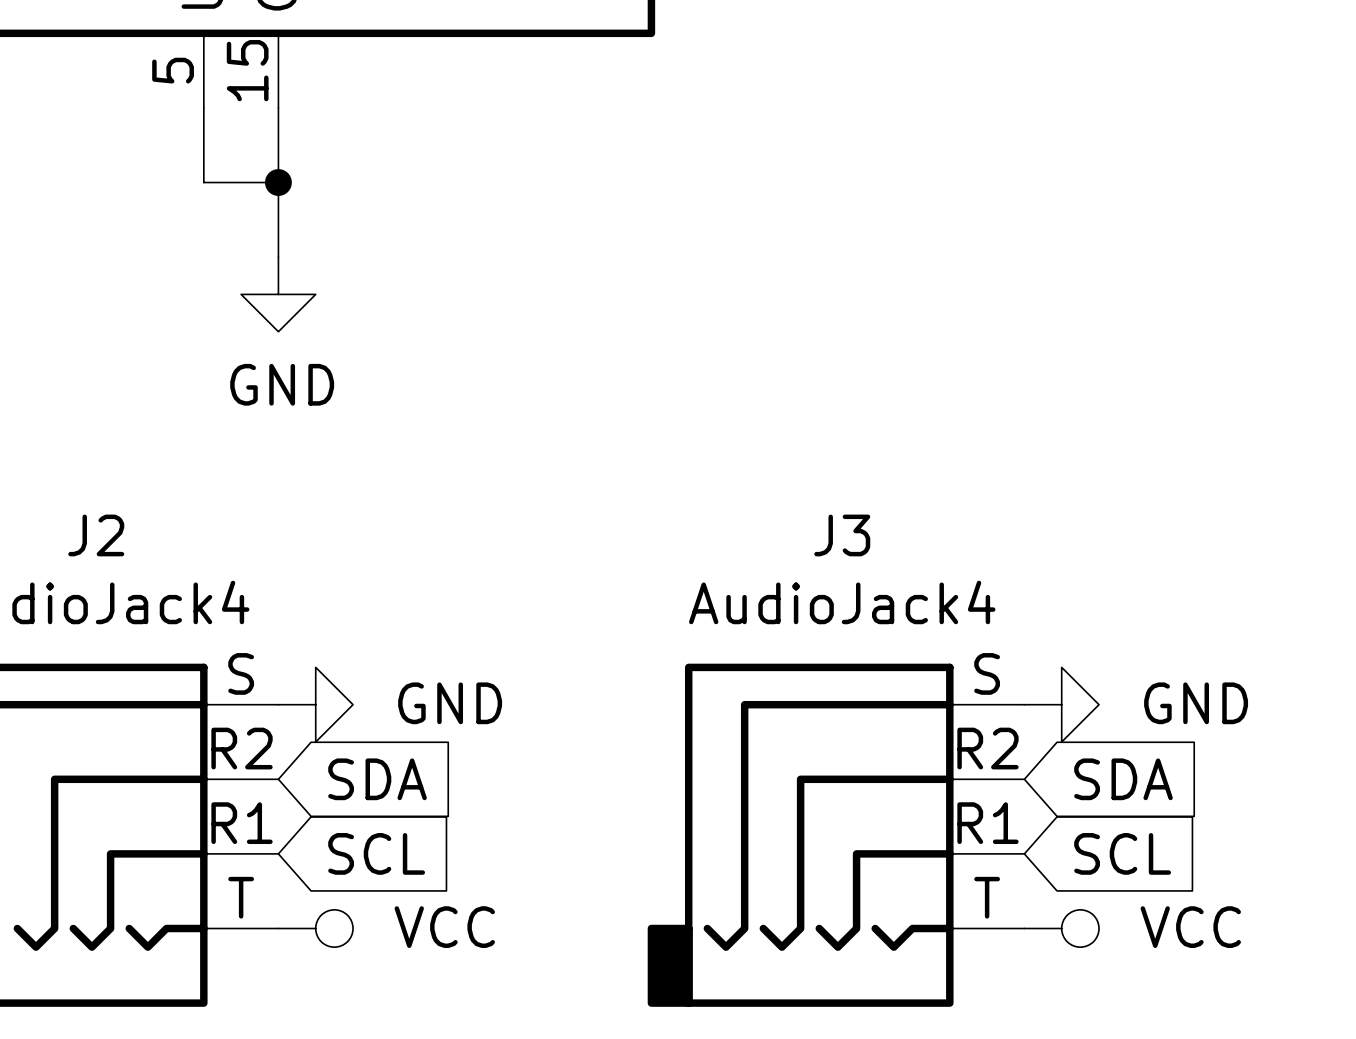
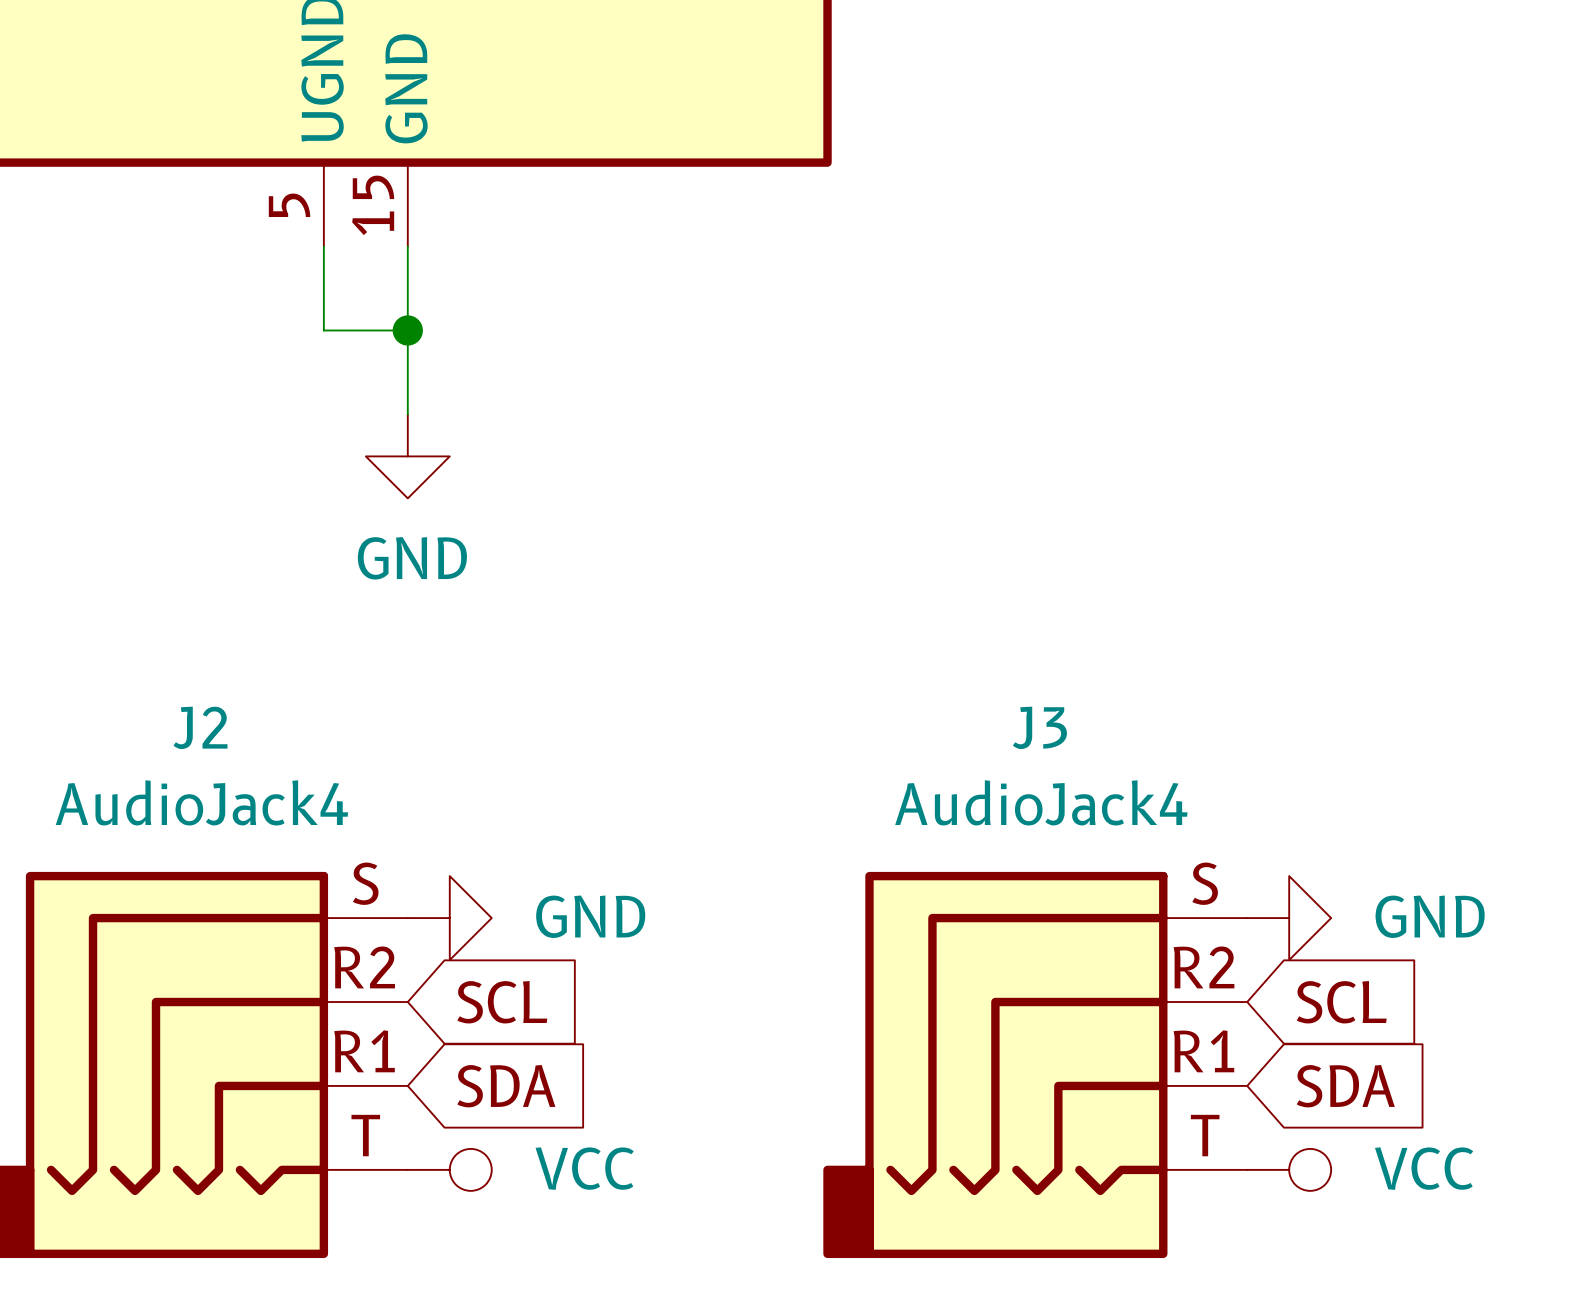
global label: SDA (377, 779) -> SCL (502, 1002)
global label: SDA (1123, 779) -> SCL (1341, 1002)
global label: SCL (376, 853) -> SDA (506, 1086)
global label: SCL (1122, 853) -> SDA (1345, 1086)

